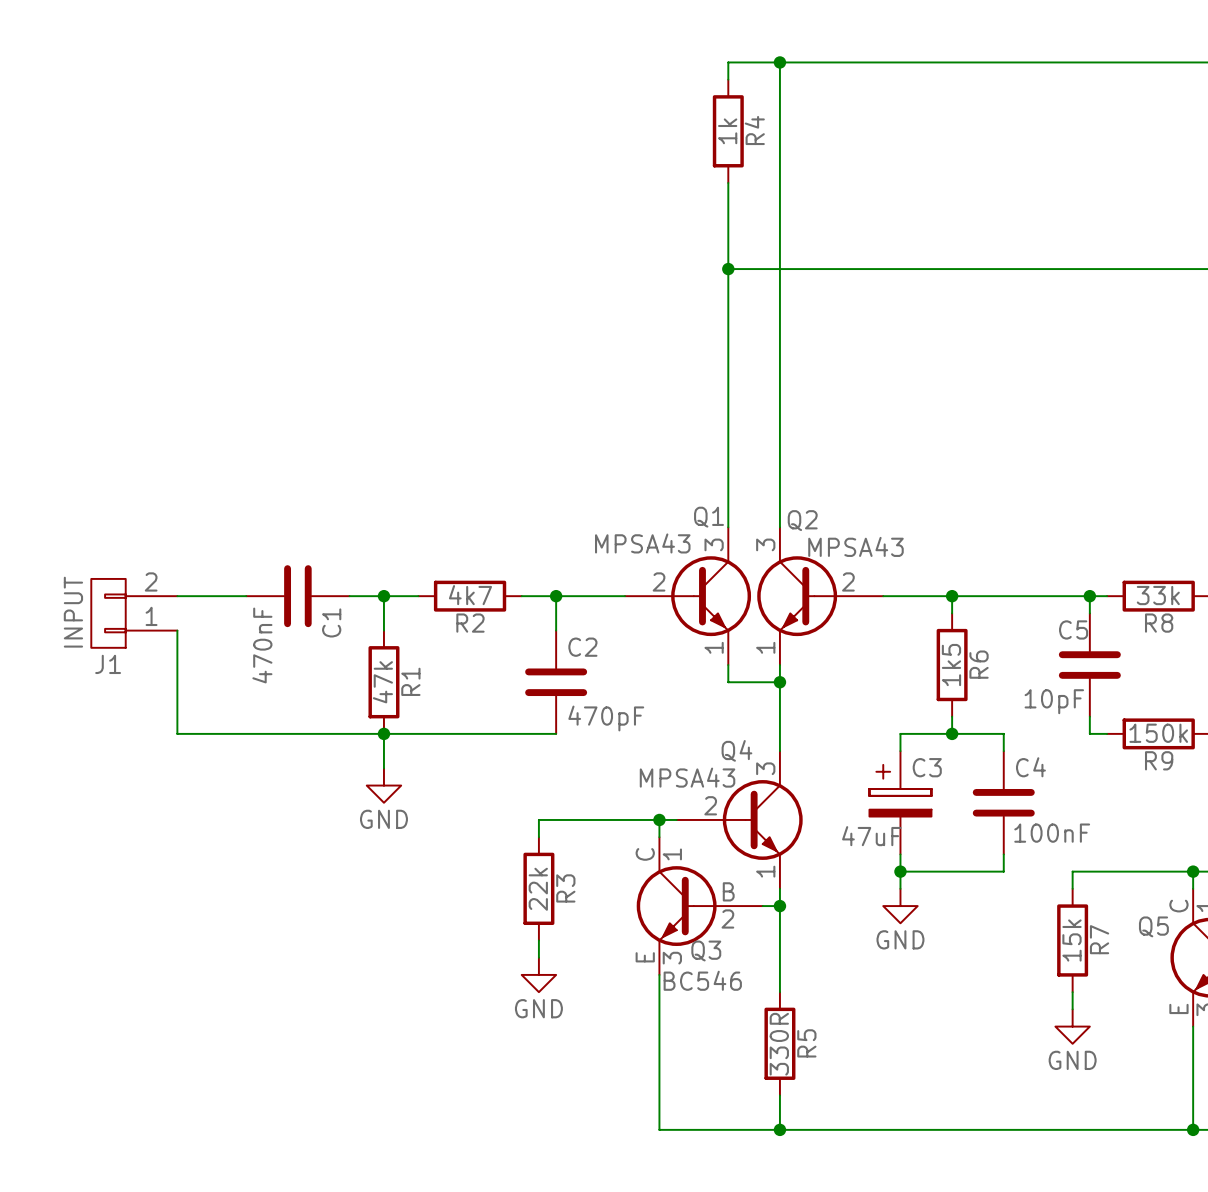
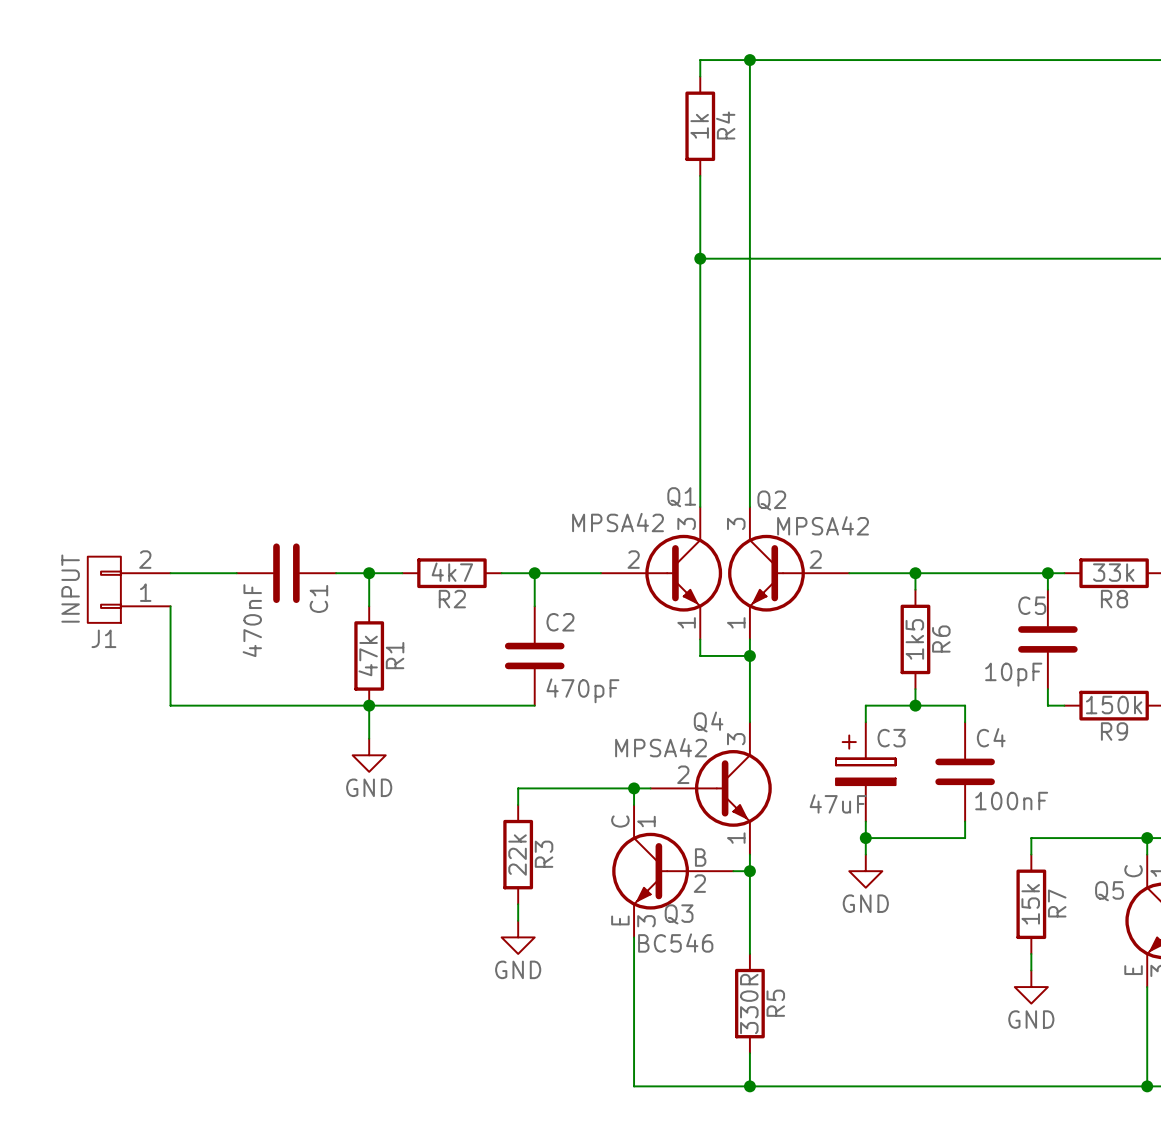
Q1 value: MPSA43 (642, 543) -> MPSA42 (618, 522)
Q2 value: MPSA43 (855, 546) -> MPSA42 (823, 525)
Q4 value: MPSA43 (687, 777) -> MPSA42 (661, 747)

